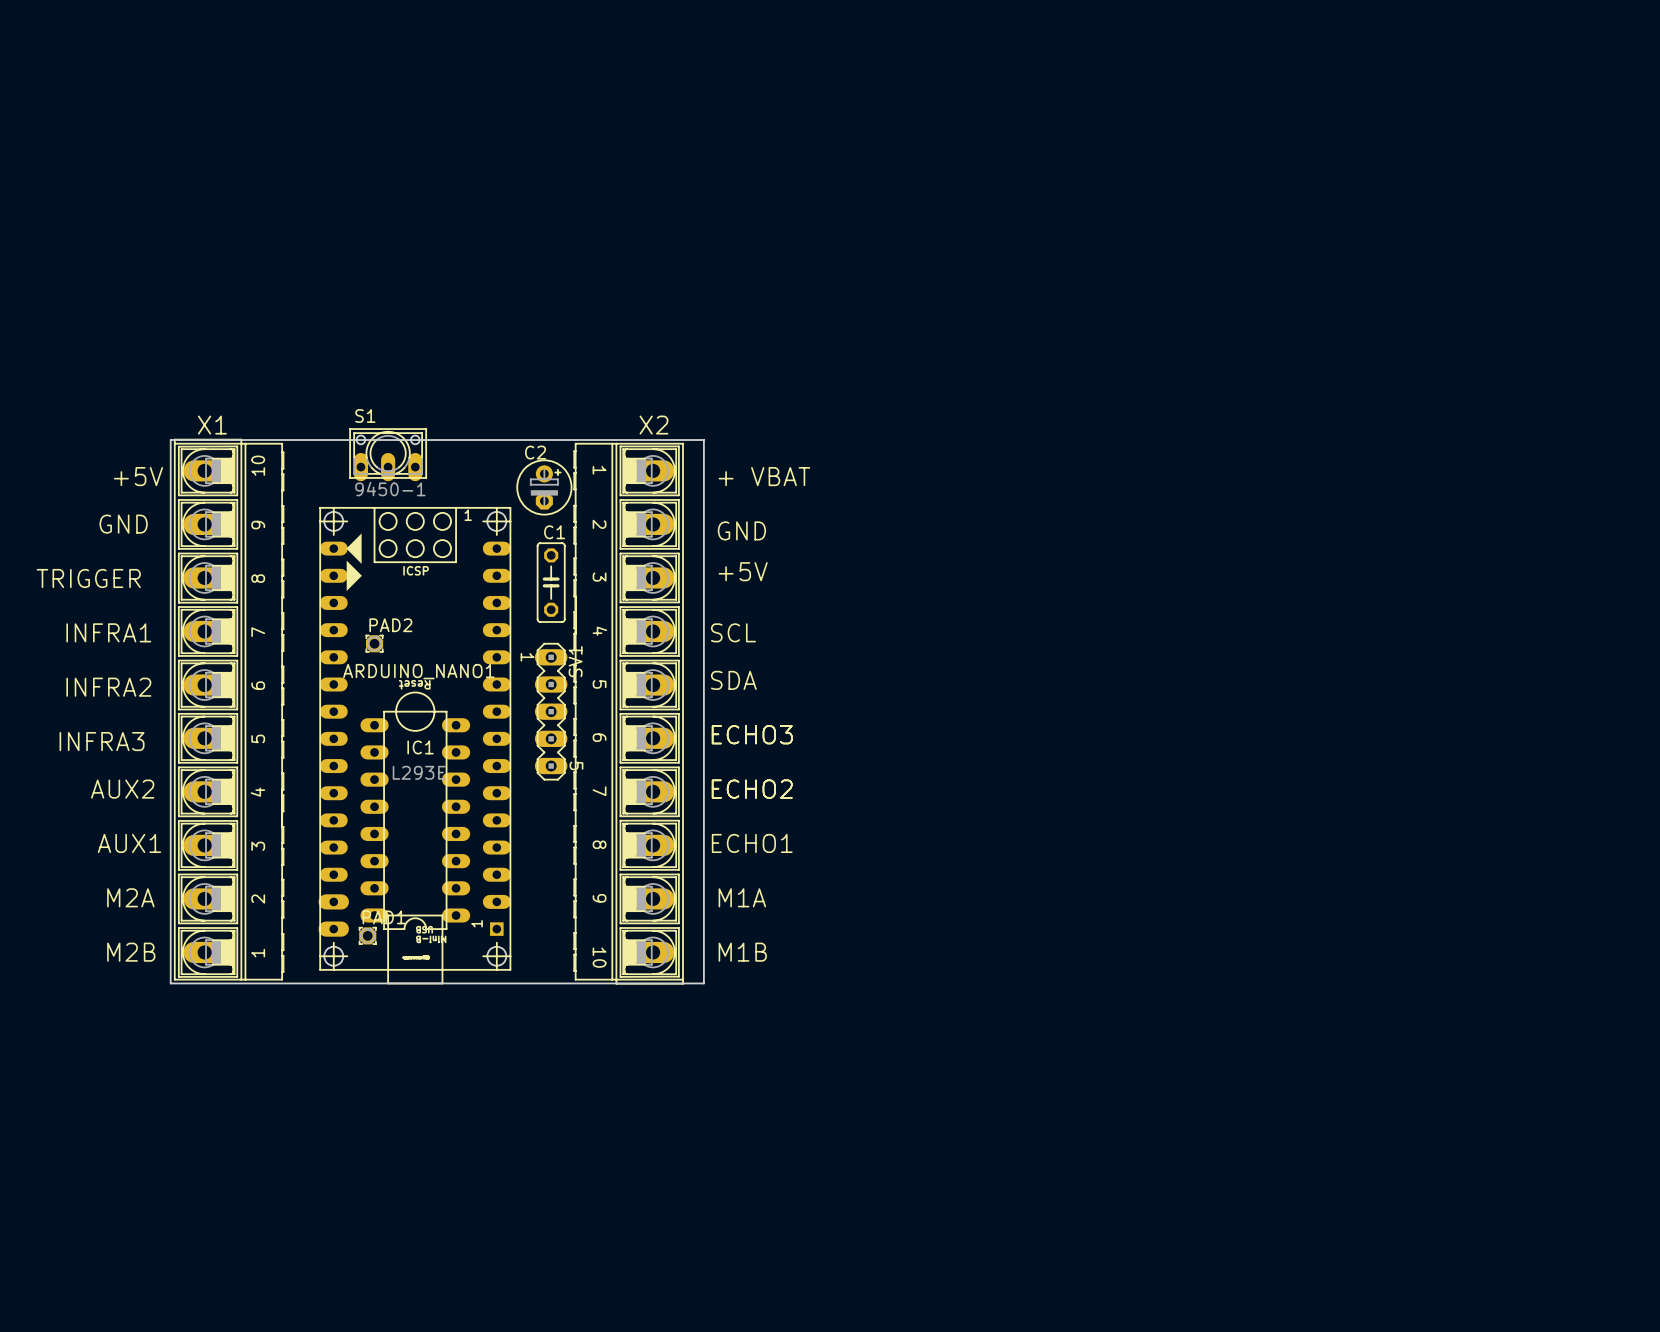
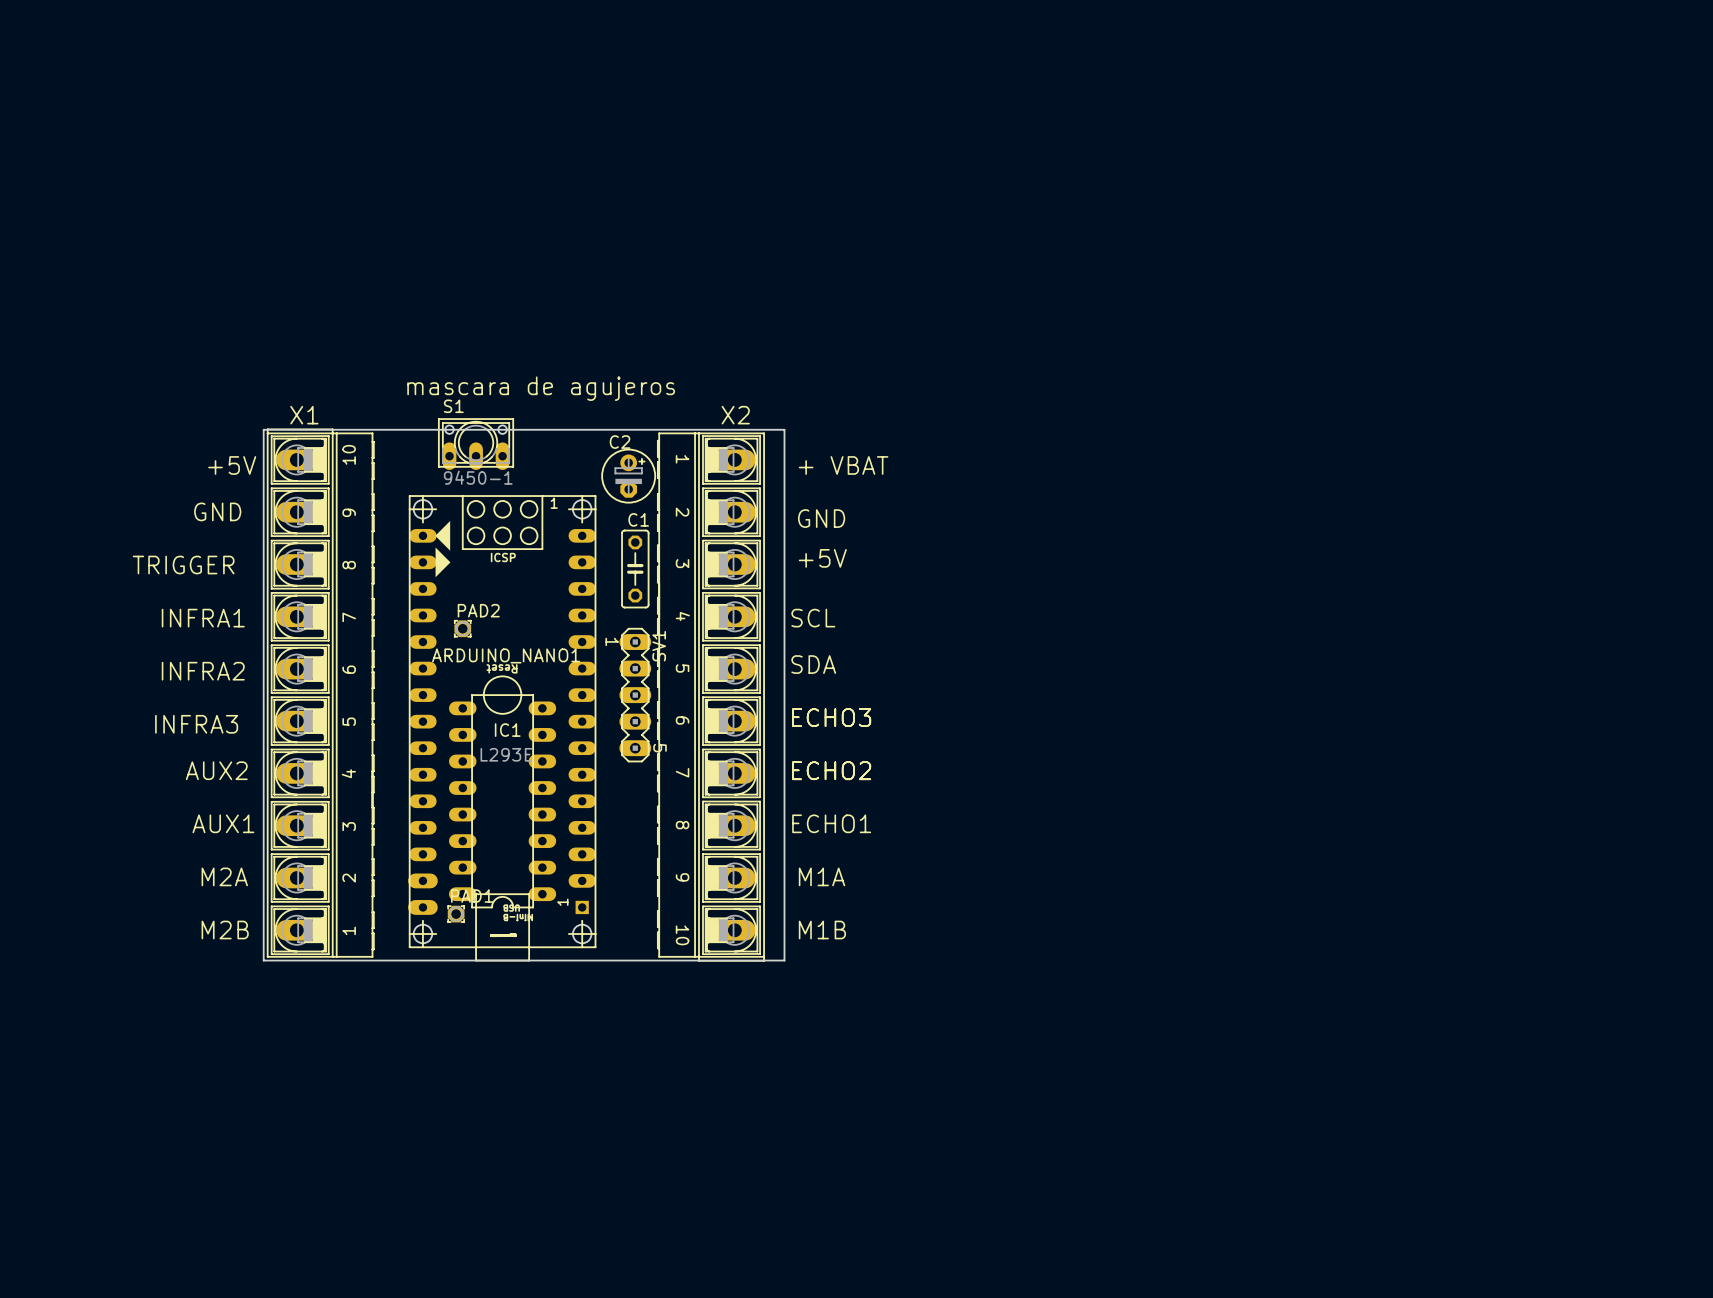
text: none -> mascara de agujeros (541, 388)

